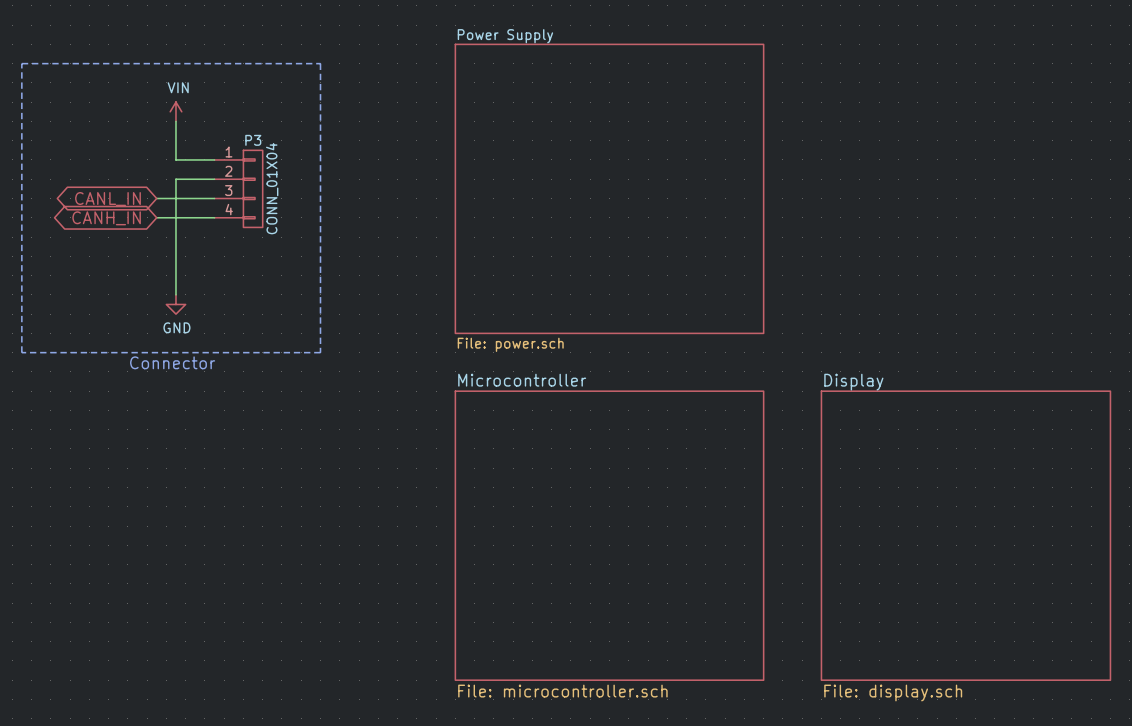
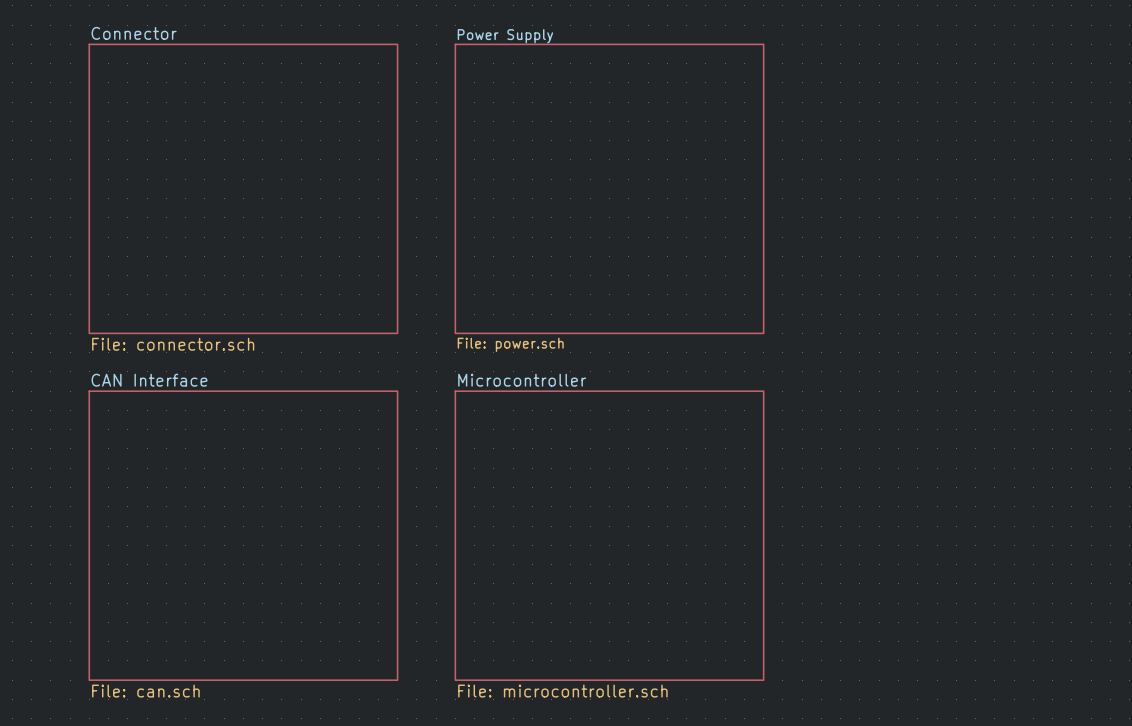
line: (21, 63) (320, 63) (320, 352) (21, 352) (21, 63) -> none
power symbol: VIN (175, 111) -> none
wire: (175, 121) (175, 159) (214, 159) -> none
wire: (214, 179) (175, 179) (175, 294) -> none
P3: CONN_01X04 (238, 188) -> none
sheet Connector: none -> File: connector.sch (243, 188)
wire: (156, 198) (214, 198) -> none
global label: CANL_IN (108, 199) -> none
wire: (156, 217) (214, 217) -> none
global label: CANH_IN (106, 218) -> none
power symbol: GND (175, 304) -> none
text: Connector (172, 362) -> none
sheet CAN Interface: none -> File: can.sch (243, 535)
sheet Display: File: display.sch (965, 535) -> none

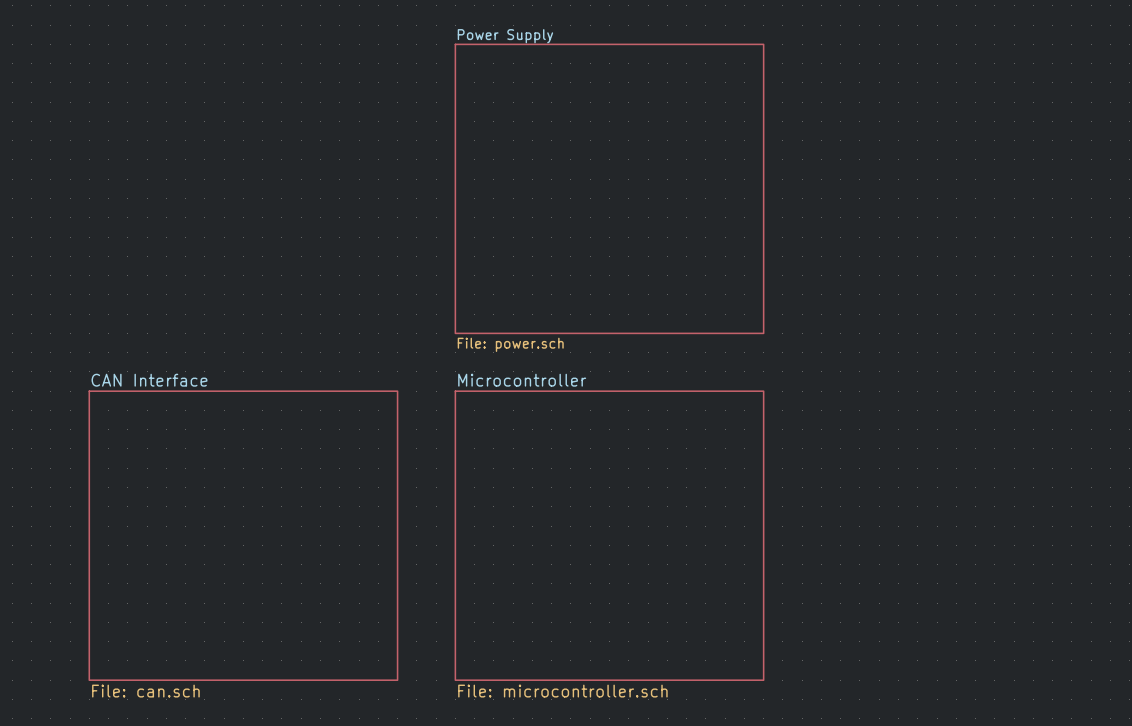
sheet Connector: File: connector.sch (243, 188) -> none

